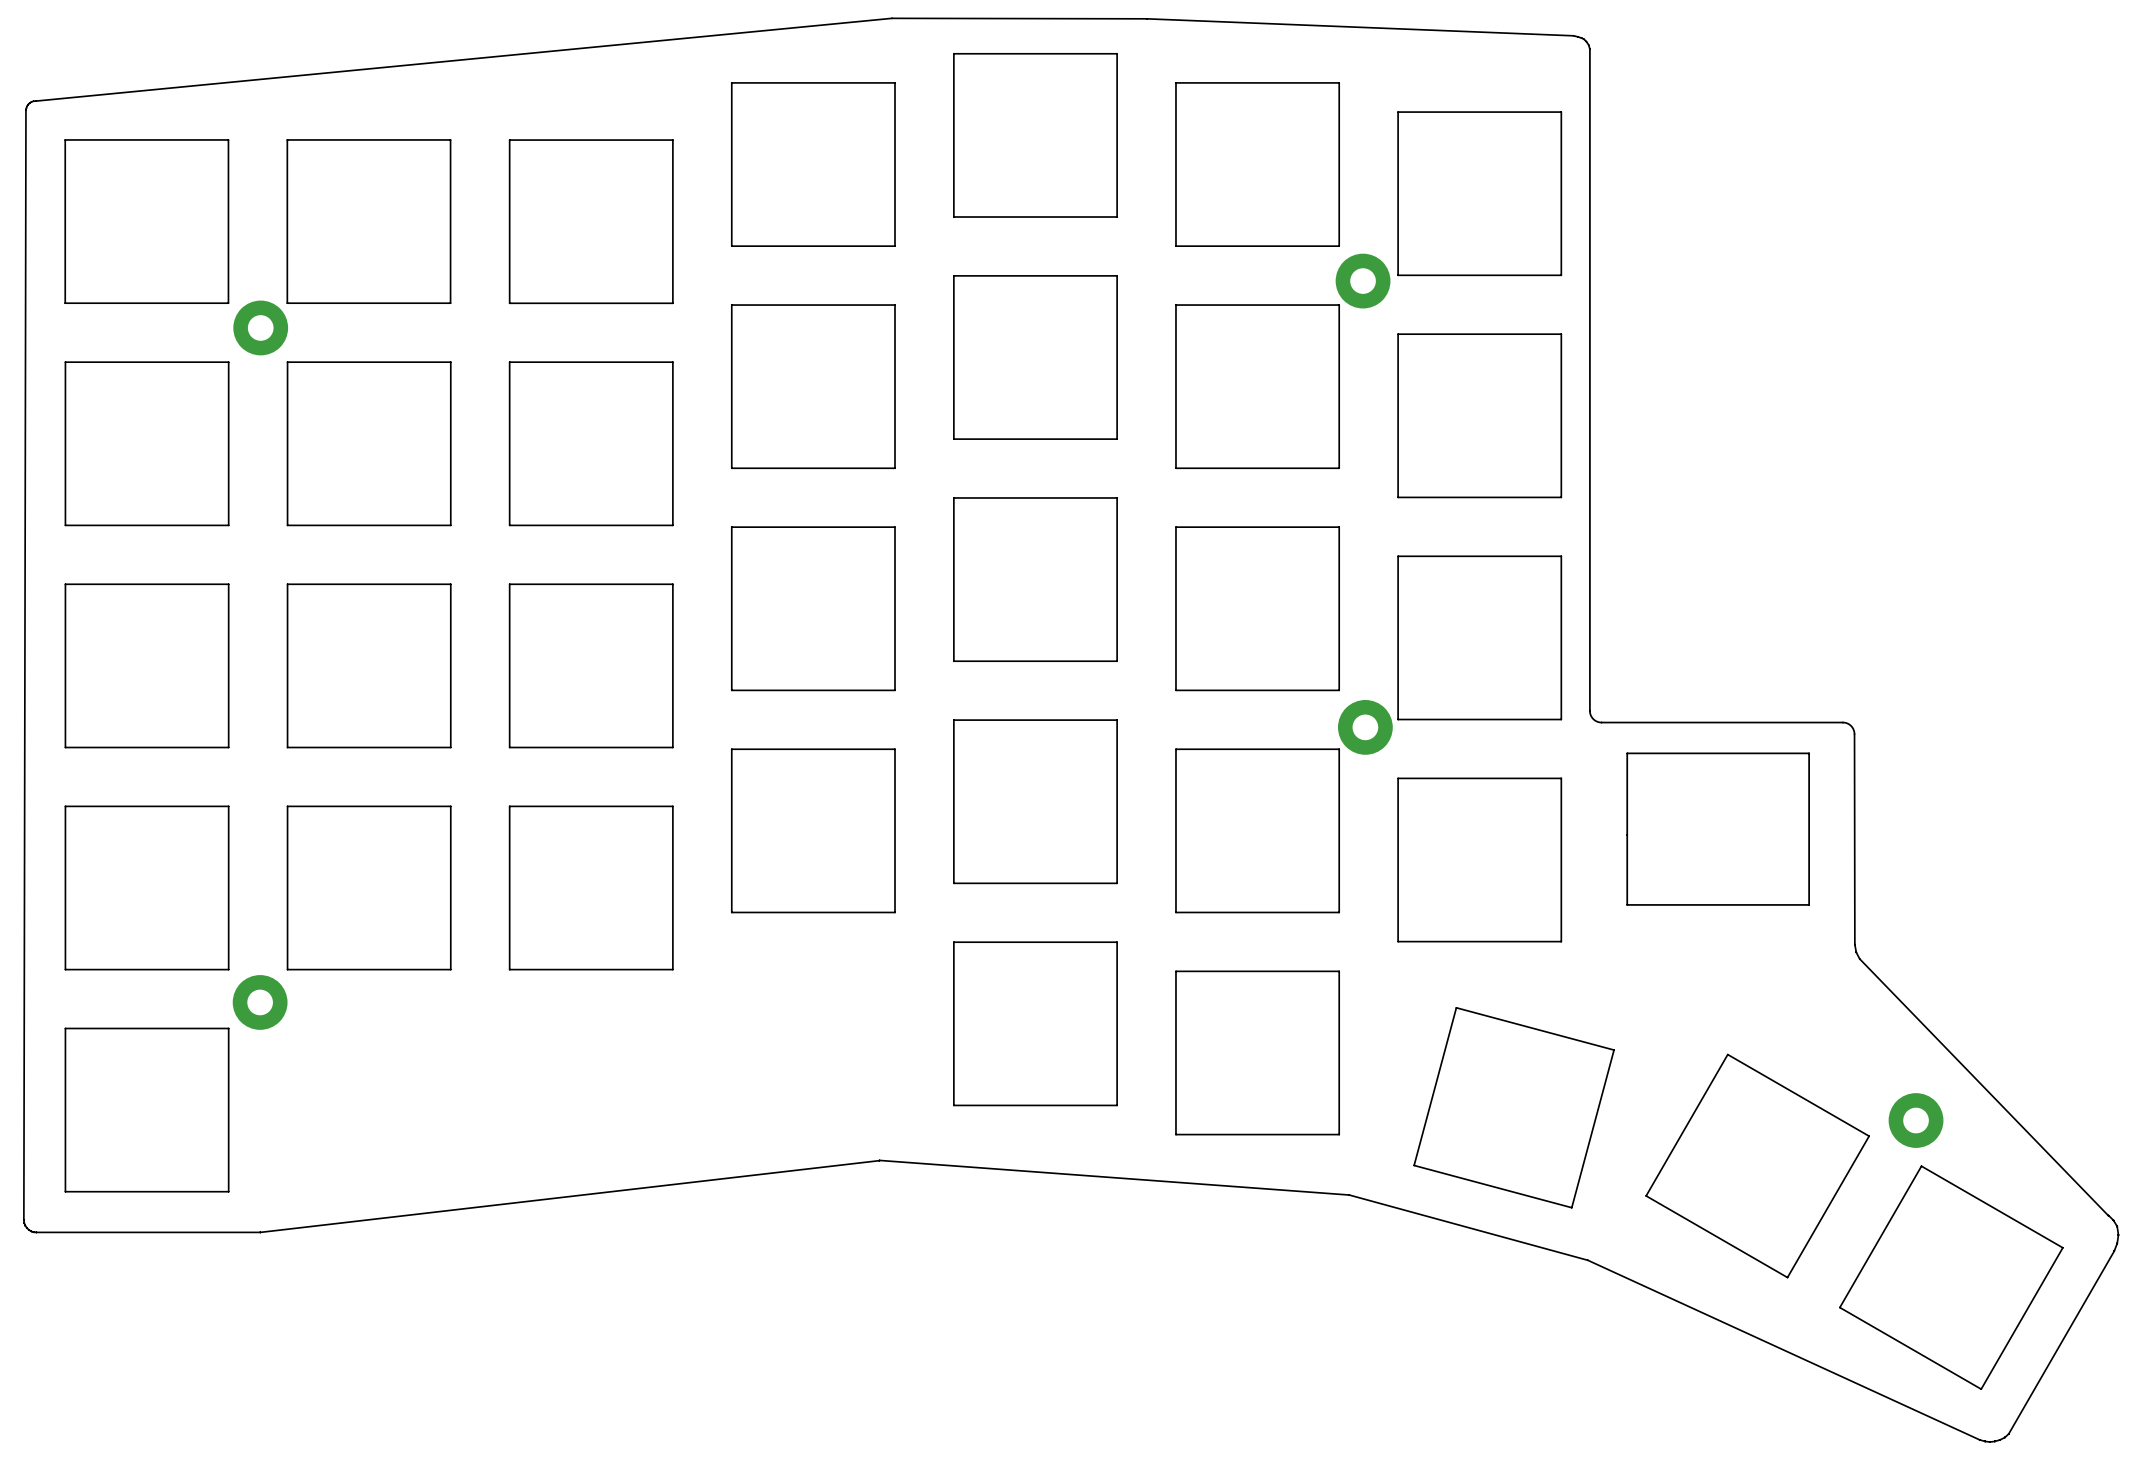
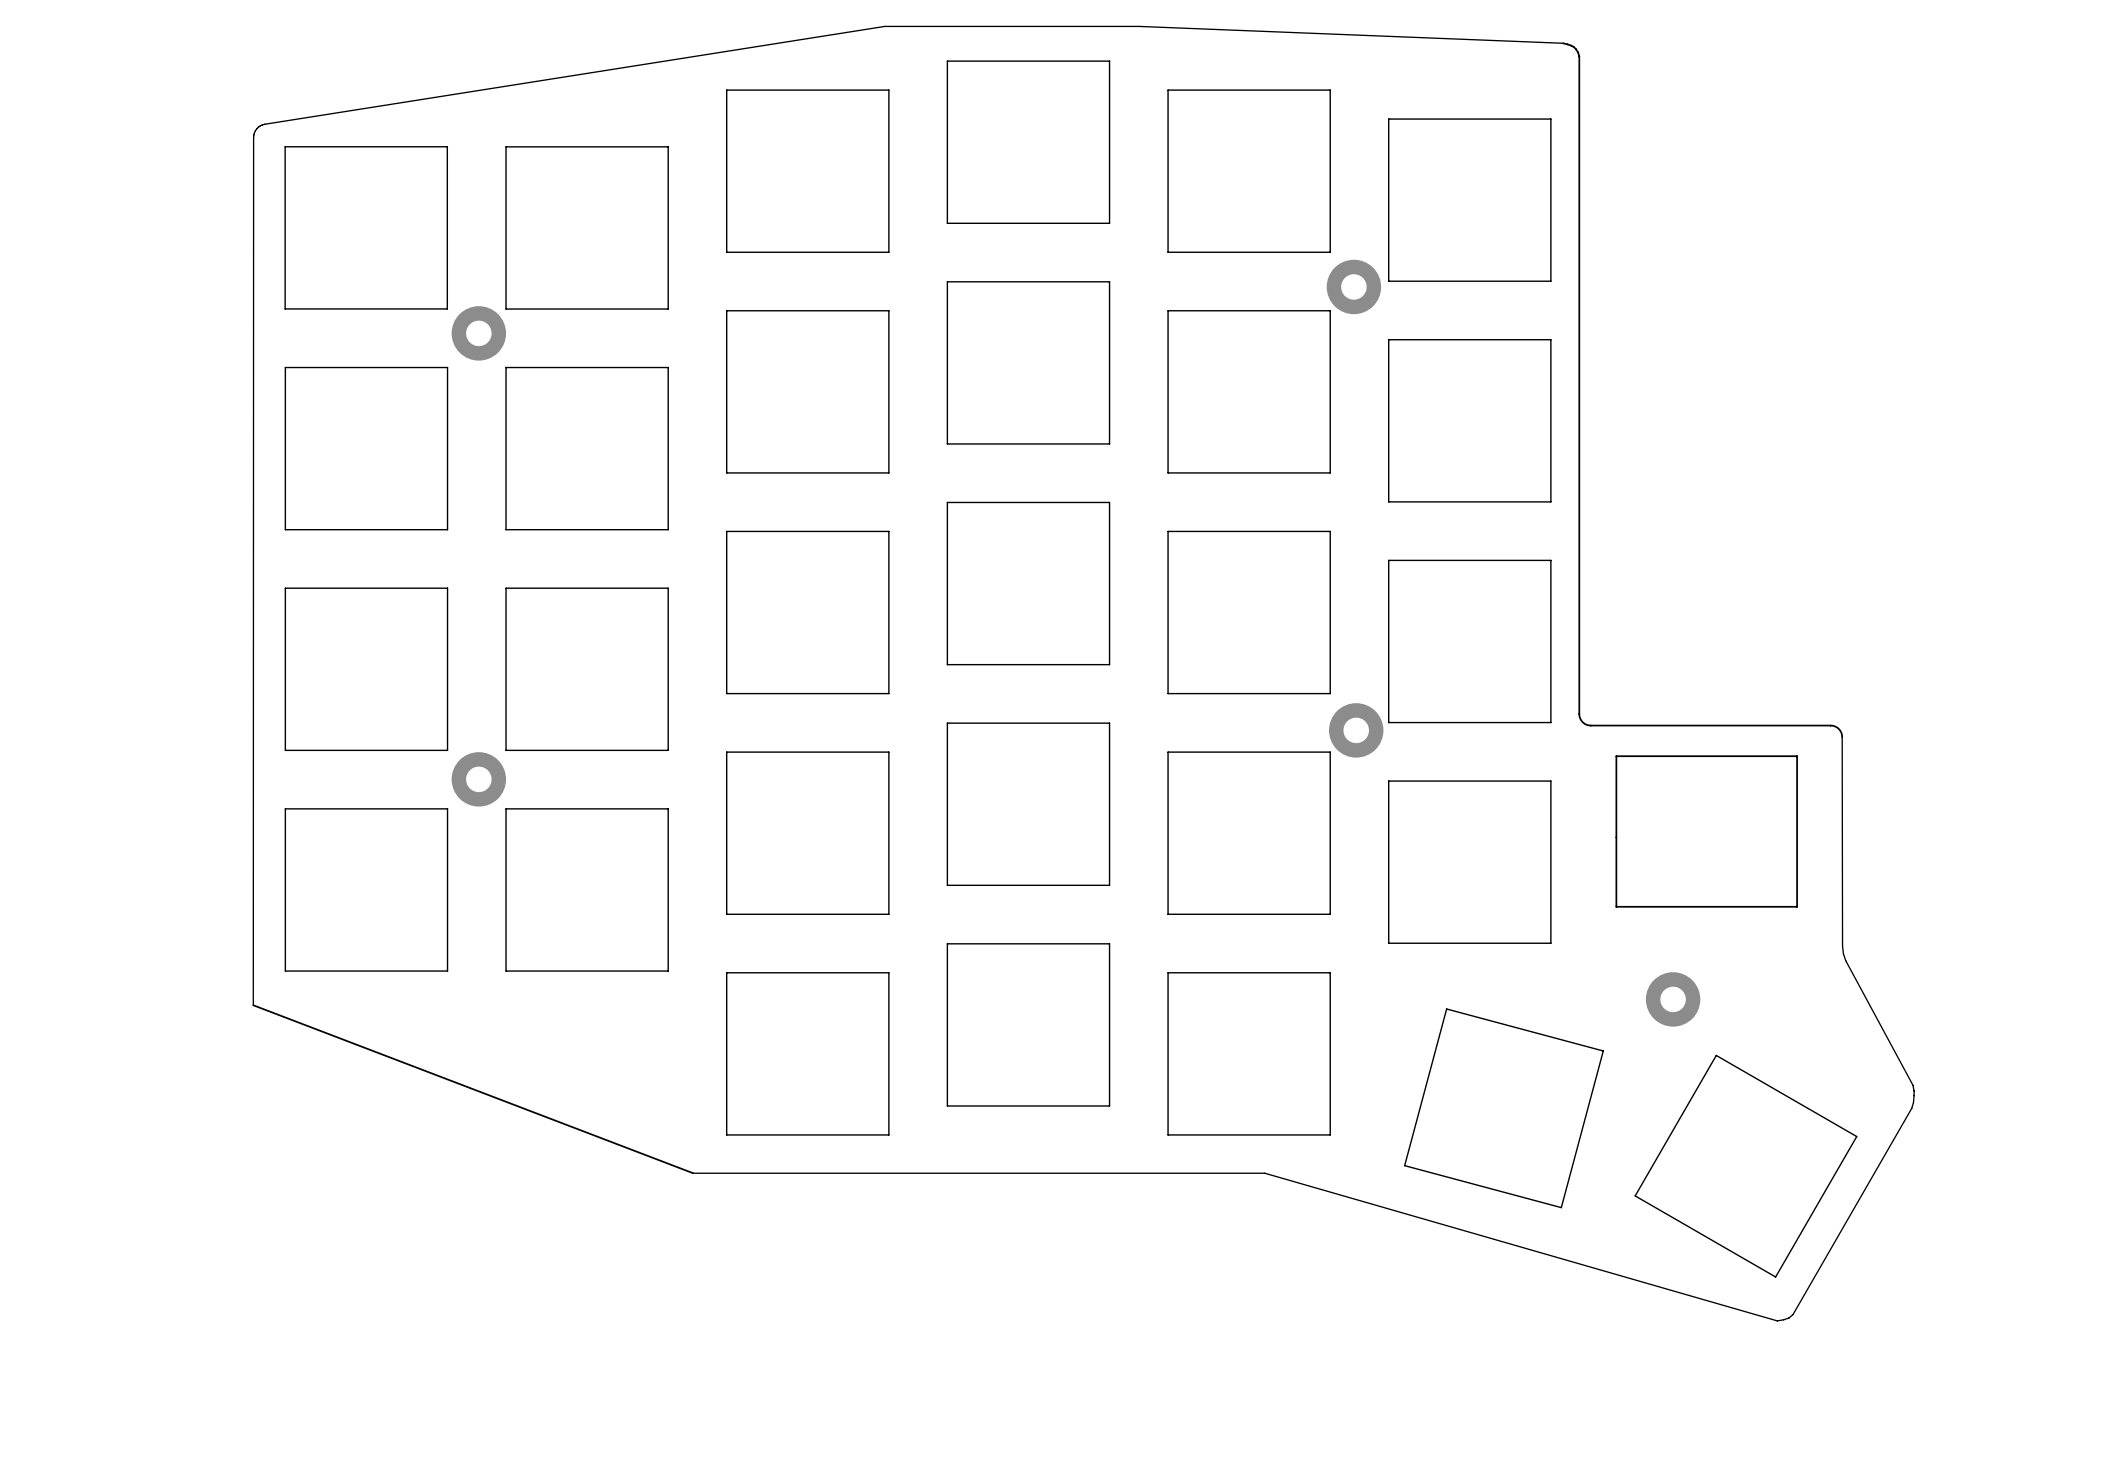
board edge: (1146, 18) (892, 18) (33, 101) (28, 104) (25, 110) (24, 1222) -> none
drawing: [64, 139, 230, 304] -> none
part position: (260, 327) -> (478, 333)
drawing: [64, 361, 230, 527] -> none
drawing: [64, 583, 230, 749] -> none
part: none -> (478, 779)
drawing: [64, 805, 230, 971] -> none
board edge: (1854, 944) (1856, 952) -> (1842, 946) (1845, 960) (1912, 1085) (1913, 1102) (1793, 1314) (1788, 1318) (1777, 1320) (1264, 1173) (693, 1173) (253, 1005) (253, 137) (256, 128) (264, 124) (884, 26) (1139, 26)
board edge: (1856, 952) (1859, 958) (2113, 1220) -> none
drawing: none -> [726, 972, 890, 1136]
part: (260, 1002) -> none
drawing: [64, 1027, 230, 1193] -> none
part position: (1916, 1120) -> (1673, 999)
board edge: (879, 1160) (1349, 1195) (1587, 1260) (1979, 1439) -> none
board edge: (879, 1160) (260, 1232) -> none
drawing: [1839, 1165, 2064, 1390] -> none
board edge: (2113, 1220) (2118, 1234) -> none
board edge: (24, 1223) (25, 1225) -> none
board edge: (25, 1225) (26, 1227) -> none
board edge: (26, 1227) (28, 1229) -> none
board edge: (29, 1230) (31, 1231) -> none
board edge: (31, 1231) (260, 1232) -> none
board edge: (2118, 1235) (2117, 1243) -> none
board edge: (2117, 1243) (2114, 1251) -> none
board edge: (2114, 1251) (2008, 1433) -> none
board edge: (2008, 1433) (2005, 1437) -> none
board edge: (2004, 1437) (2000, 1439) -> none
board edge: (1979, 1439) (1985, 1441) -> none
board edge: (2000, 1439) (1994, 1441) -> none
board edge: (1985, 1441) (1989, 1442) -> none
board edge: (1994, 1441) (1990, 1442) -> none

